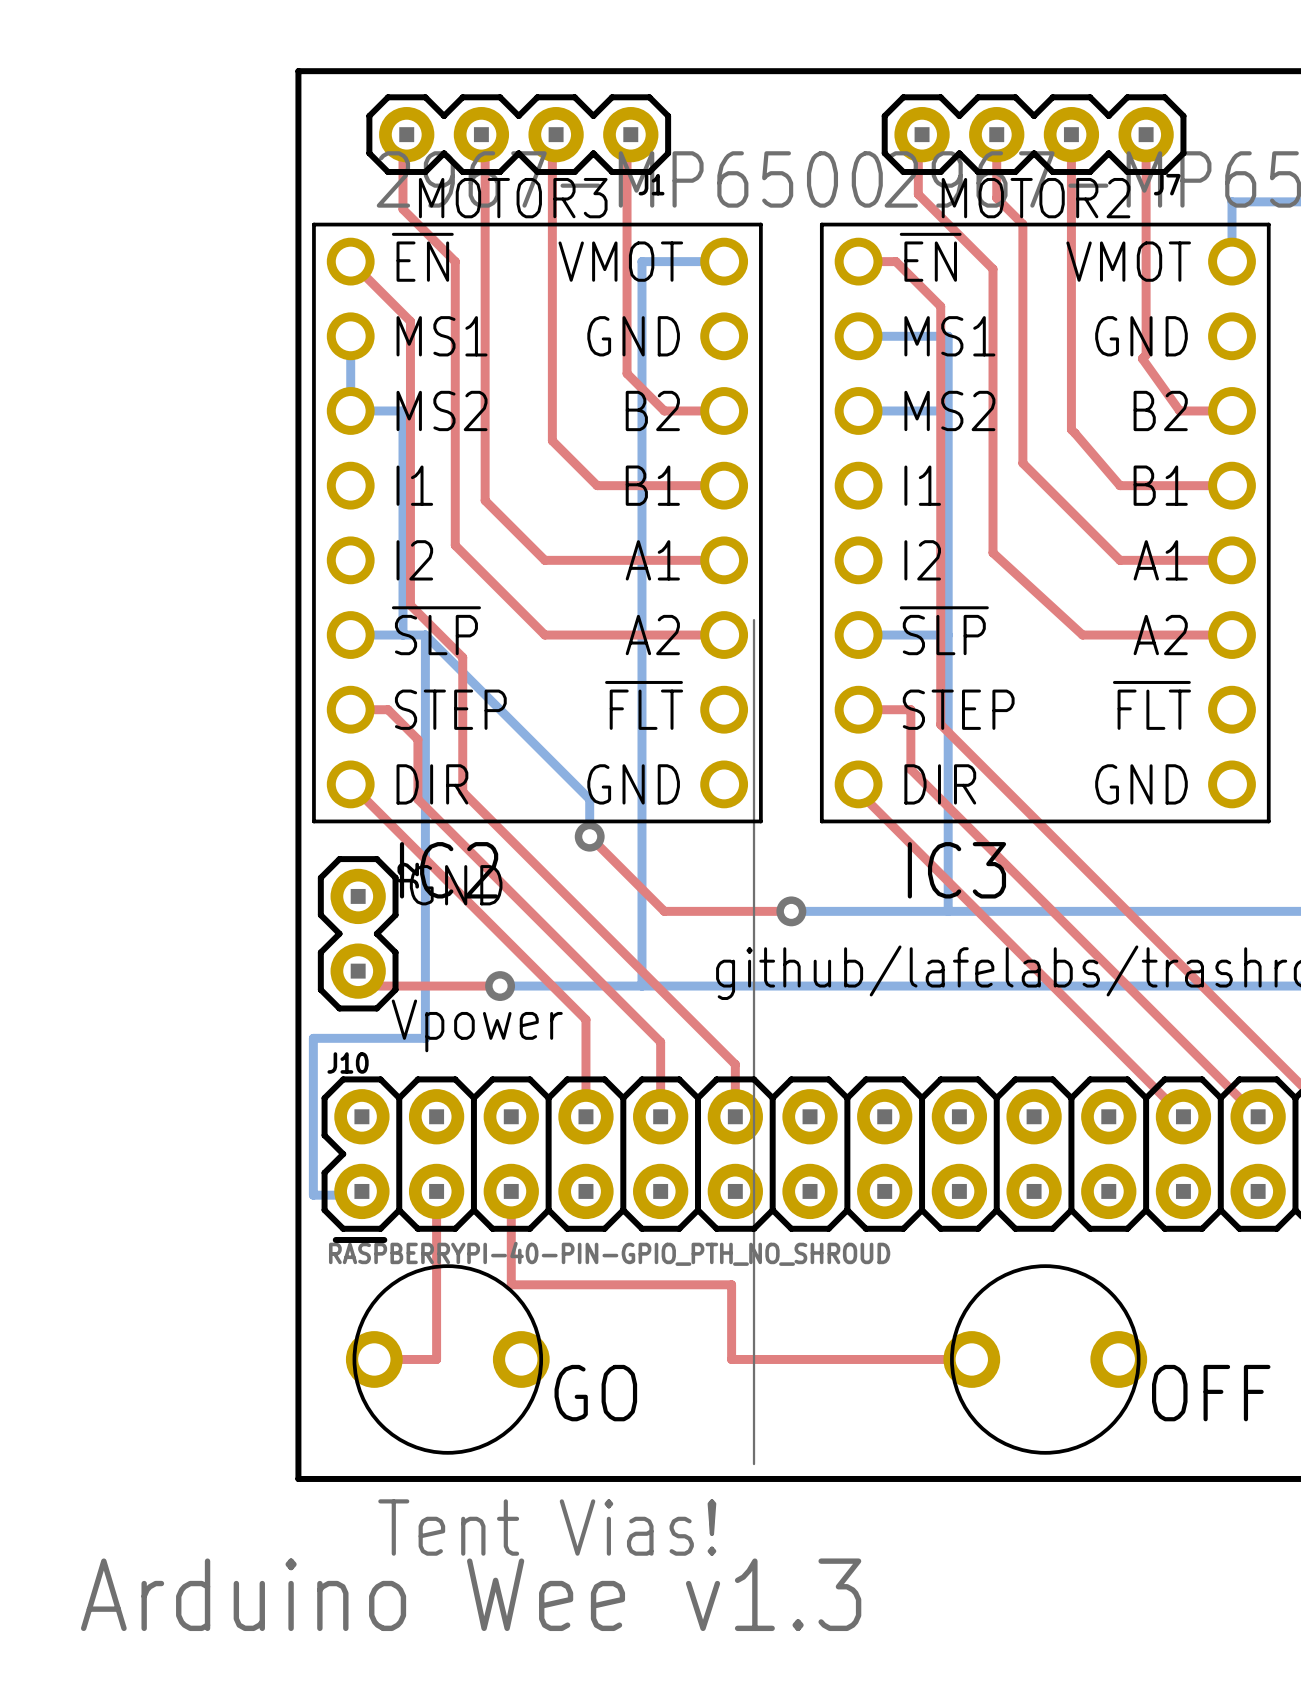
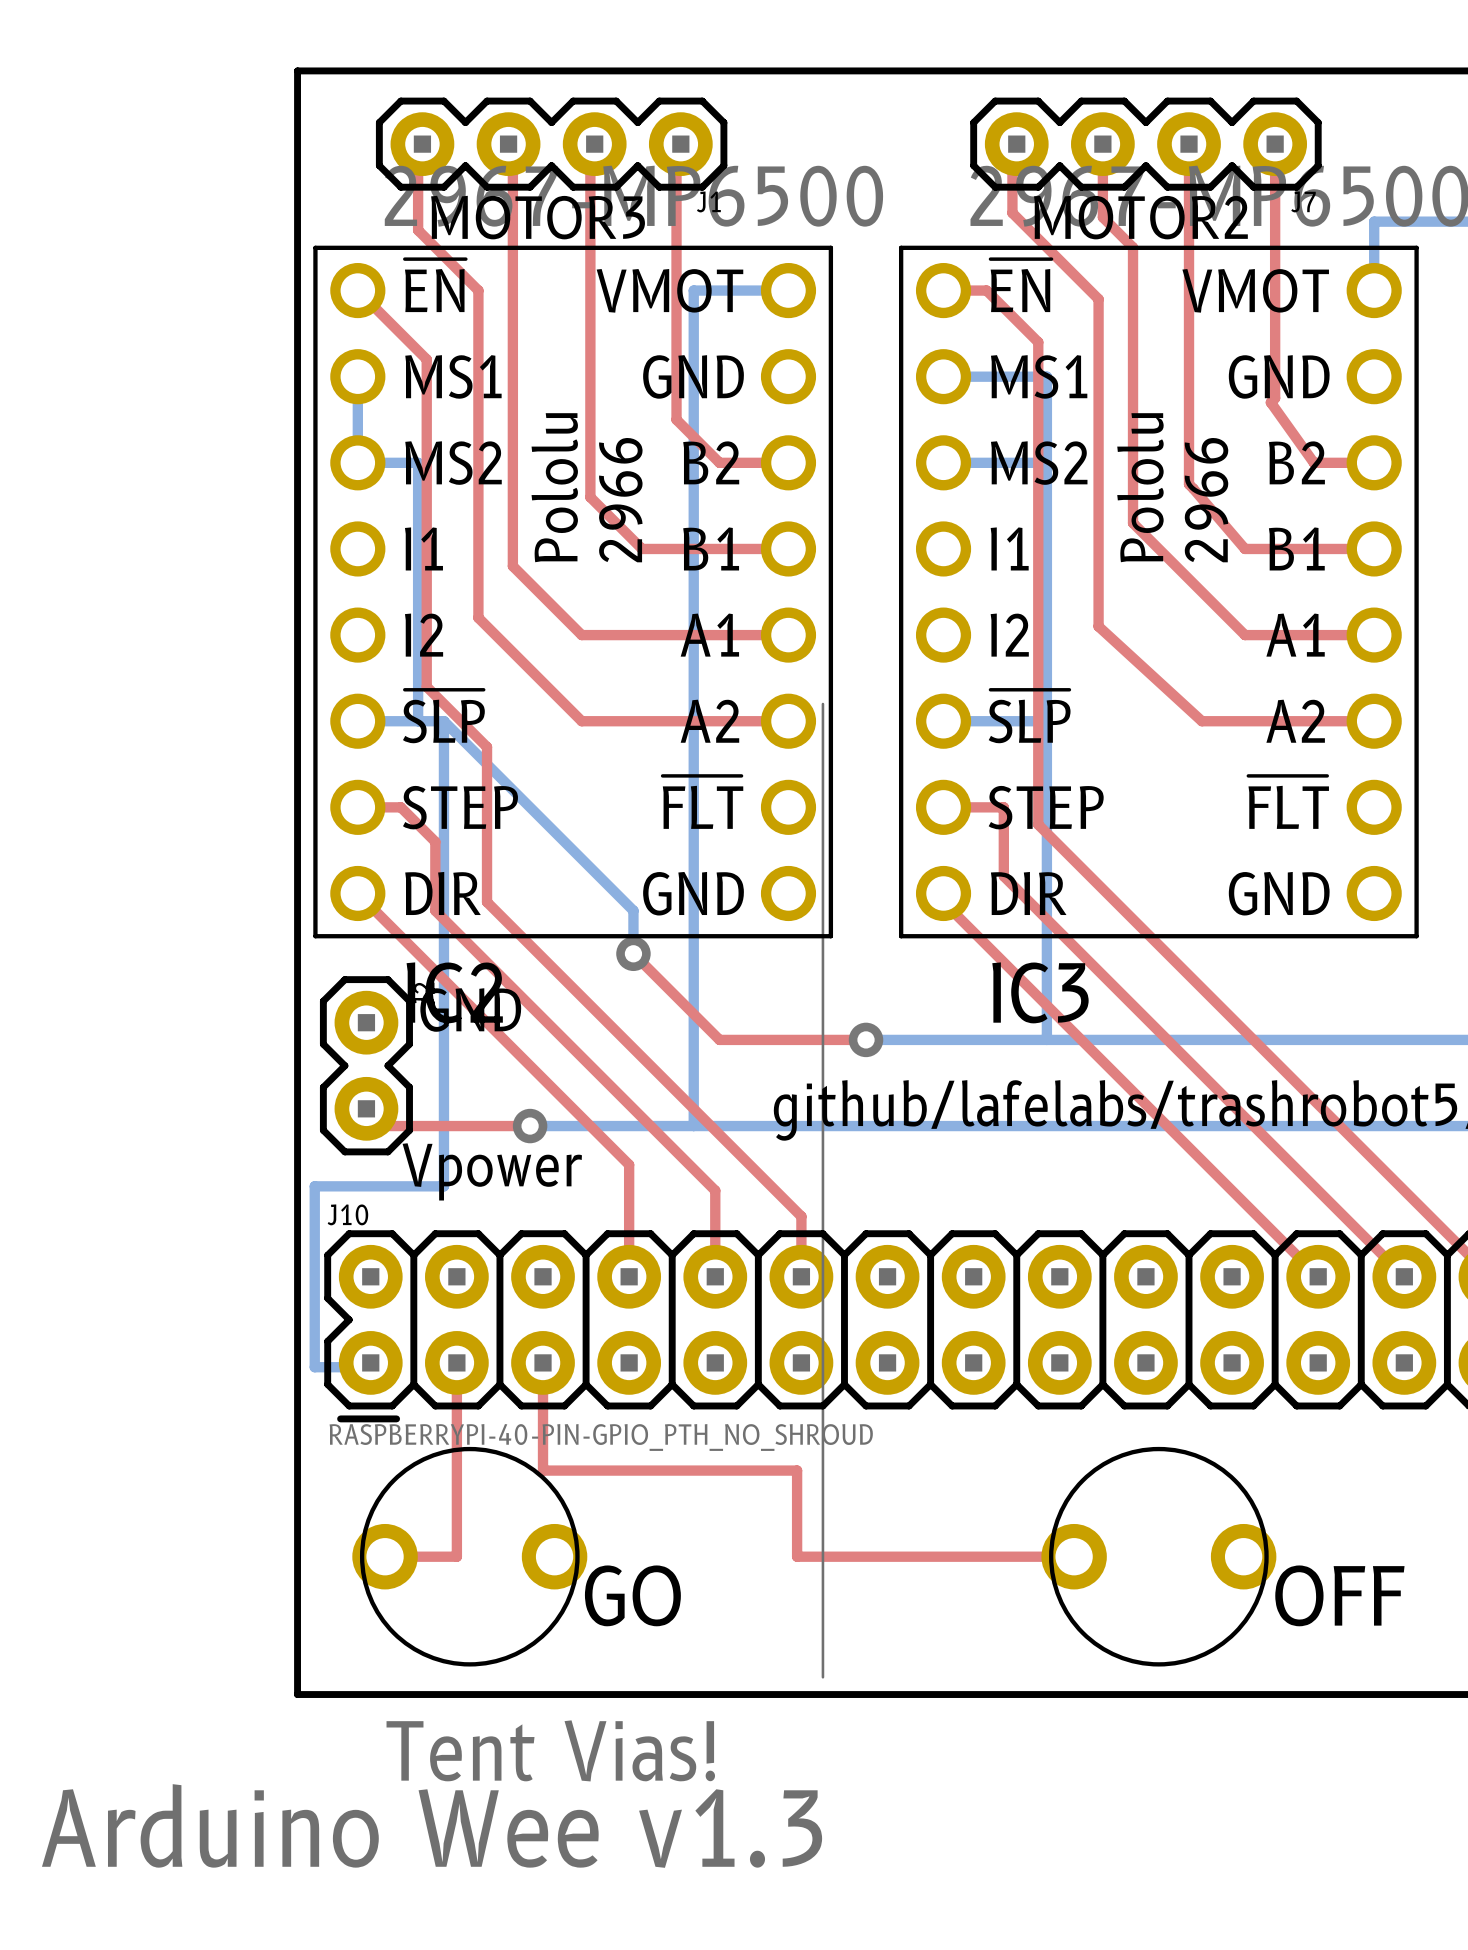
text: none -> Pololu (554, 487)
text: none -> Pololu (1140, 487)
text: none -> 2966 (620, 500)
text: none -> 2966 (1206, 500)

